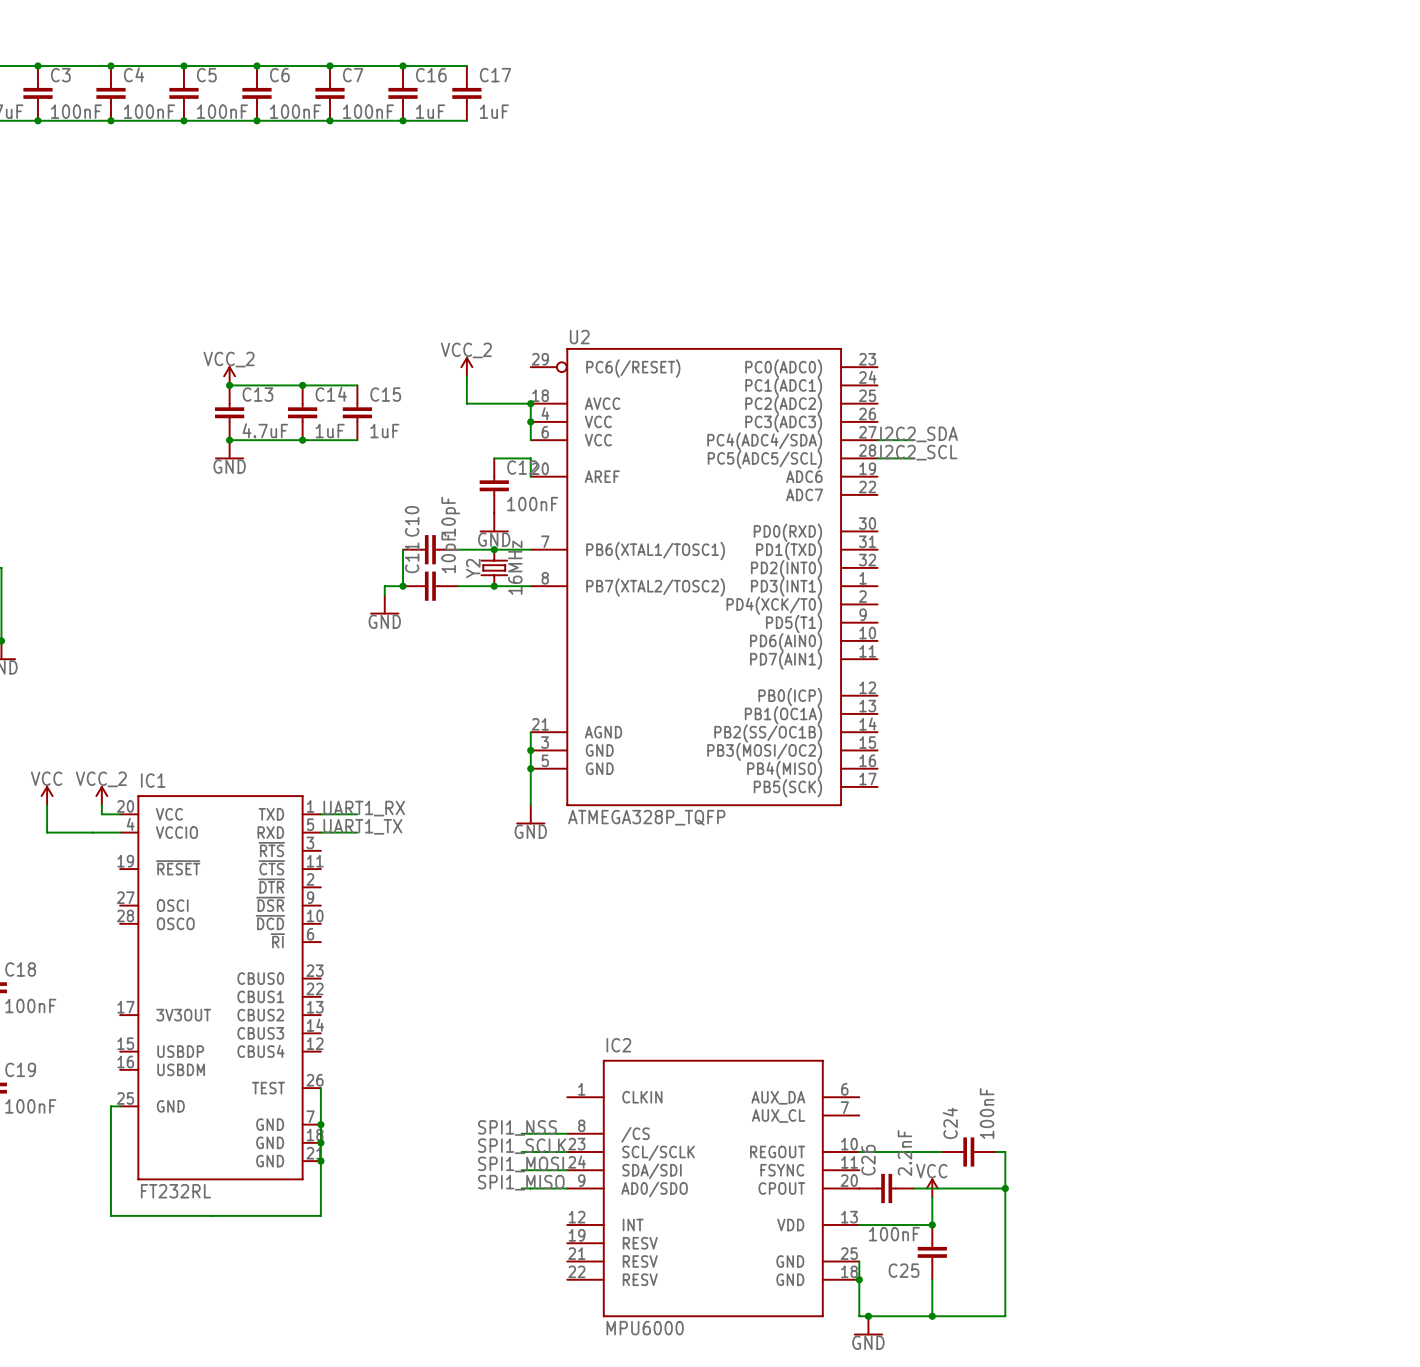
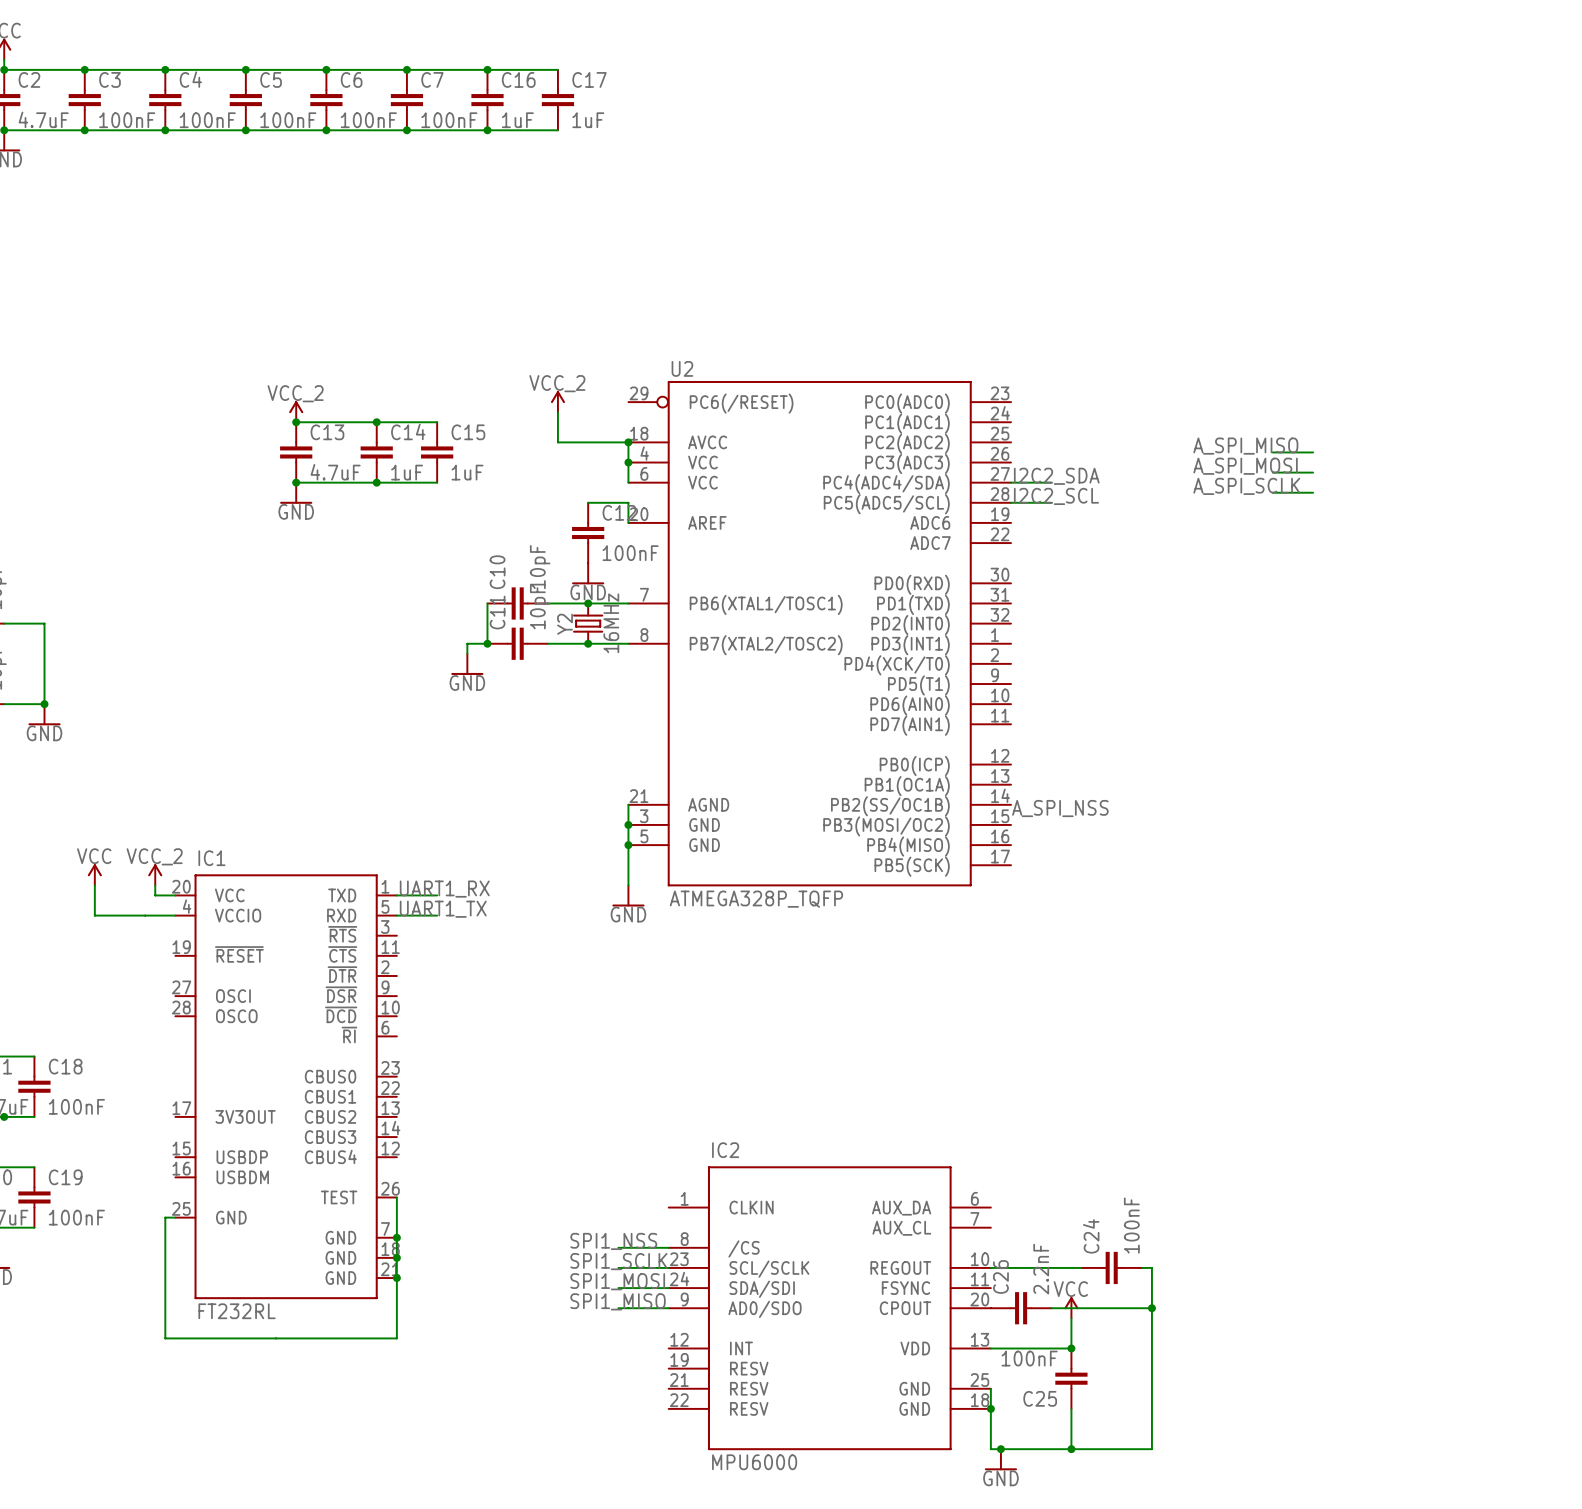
label: none -> A_SPI_MISO (1245, 446)
wire: none -> (1272, 452) (1313, 452)
label: none -> A_SPI_MOSI (1245, 466)
wire: none -> (1272, 472) (1313, 472)
label: none -> A_SPI_SCLK (1246, 486)
wire: none -> (1272, 492) (1313, 492)
label: none -> A_SPI_NSS (1060, 808)

